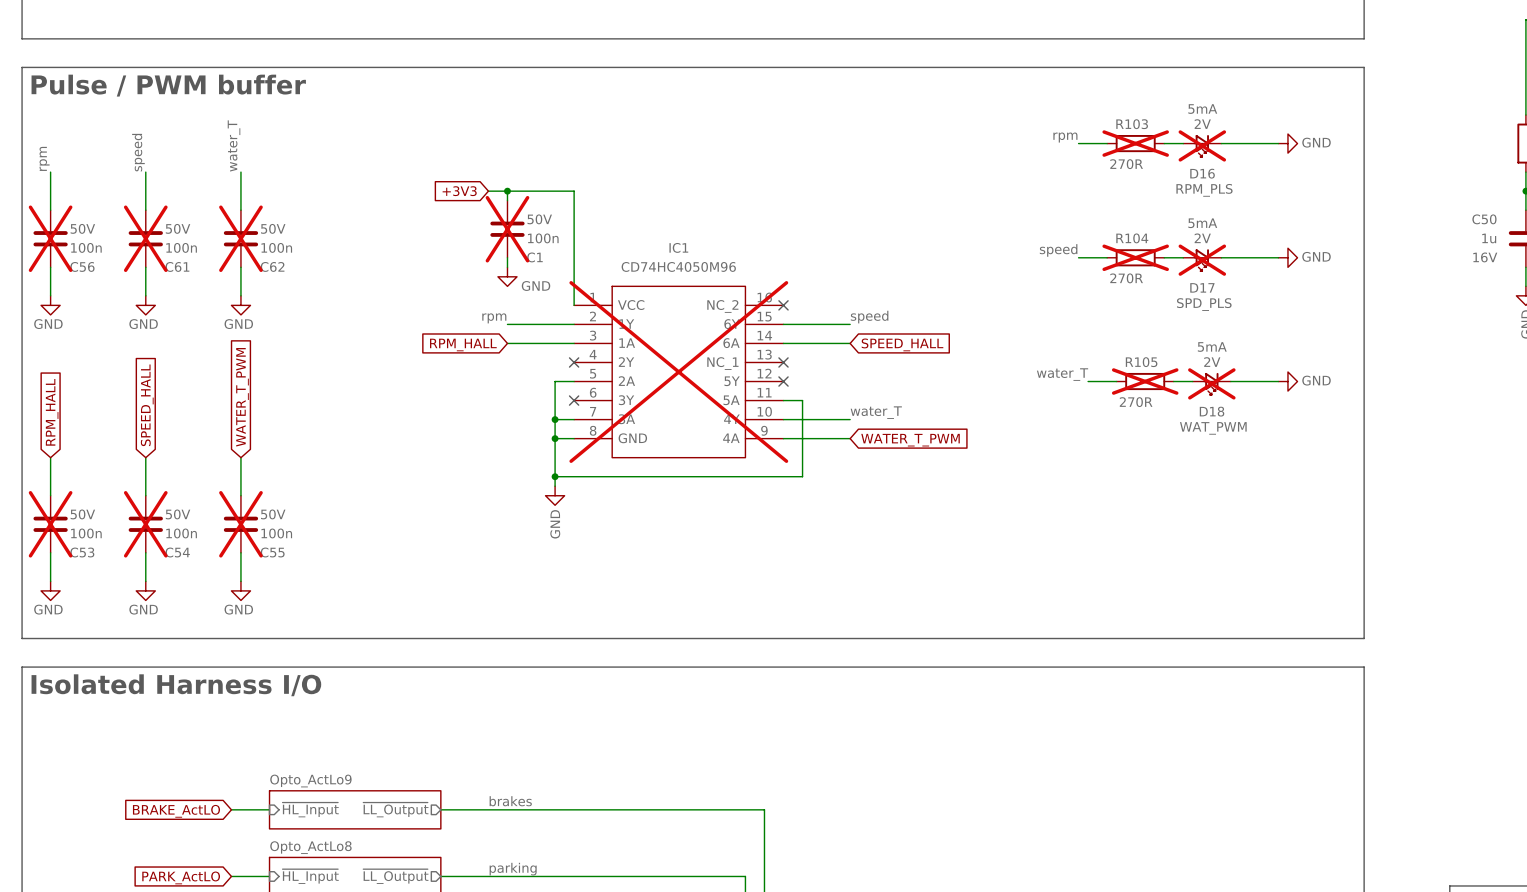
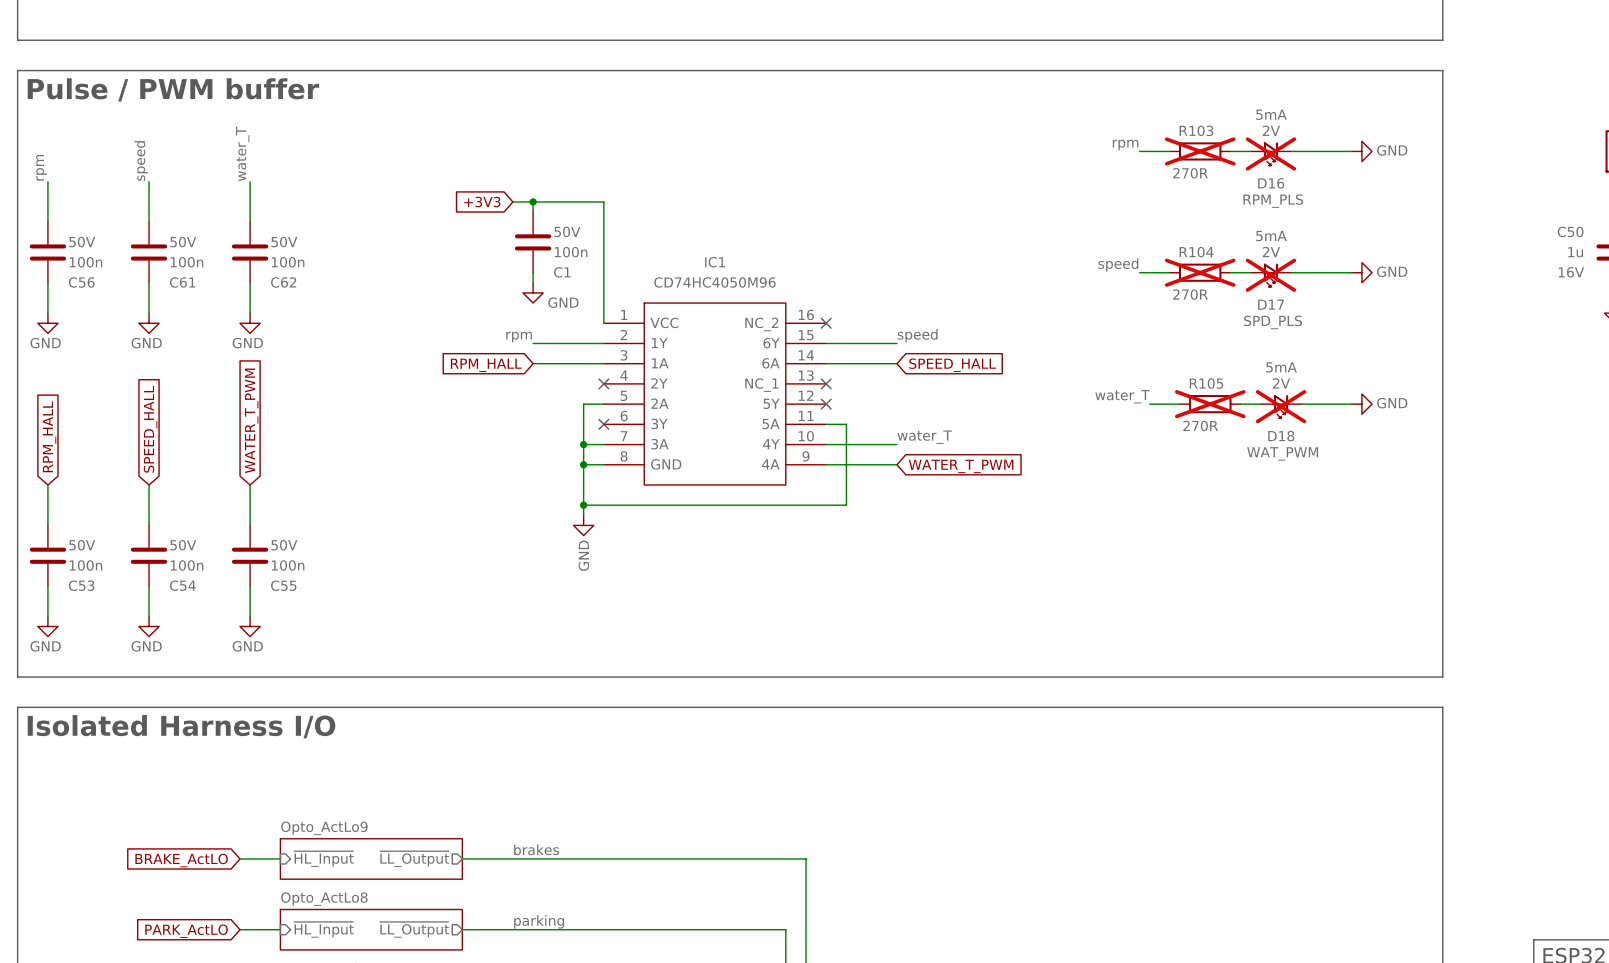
C1 do-not-place cross: (507, 229) -> none
C56 do-not-place cross: (50, 238) -> none
C61 do-not-place cross: (145, 238) -> none
C62 do-not-place cross: (240, 238) -> none
IC1 do-not-place cross: (678, 372) -> none
C53 do-not-place cross: (50, 524) -> none
C54 do-not-place cross: (145, 524) -> none
C55 do-not-place cross: (240, 524) -> none

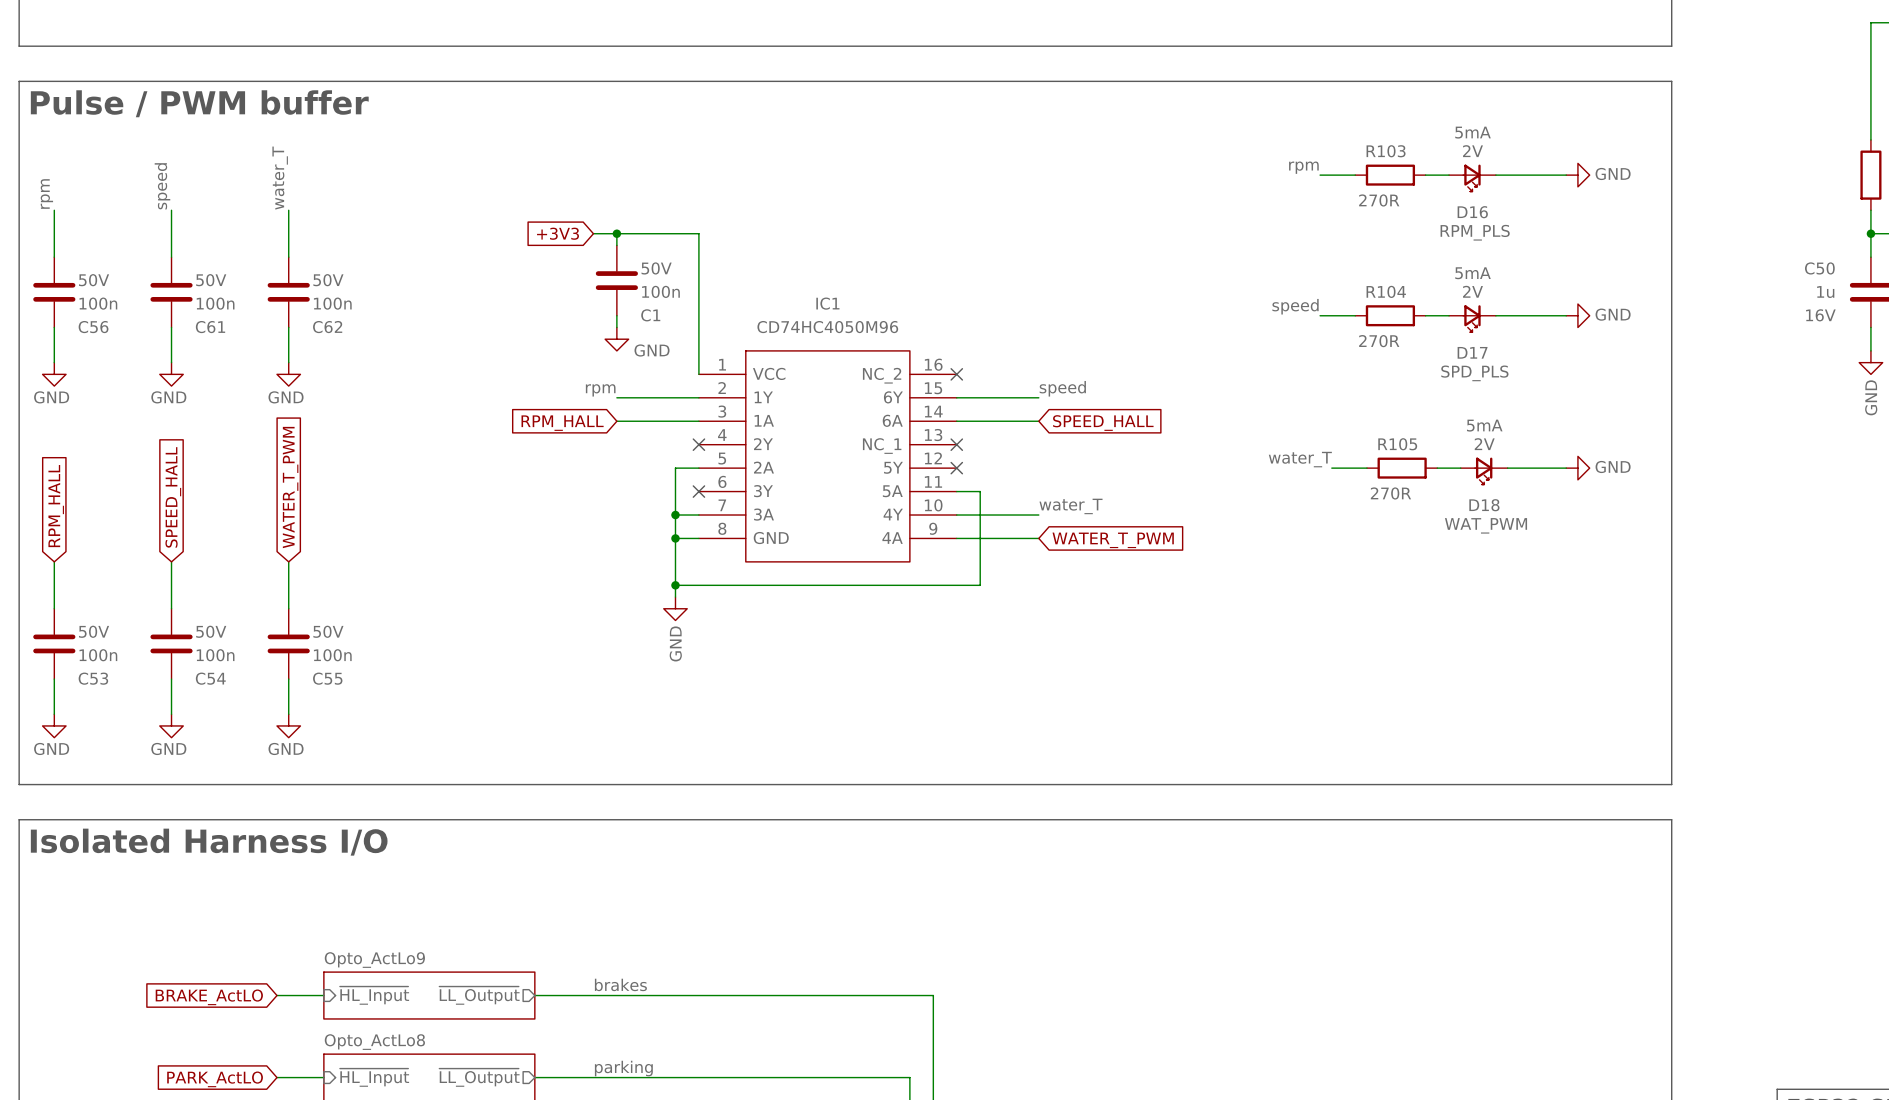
R103 do-not-place cross: (1200, 151) -> none
D16 do-not-place cross: (1270, 153) -> none
R104 do-not-place cross: (1200, 272) -> none
D17 do-not-place cross: (1270, 275) -> none
R105 do-not-place cross: (1210, 404) -> none
D18 do-not-place cross: (1281, 406) -> none

